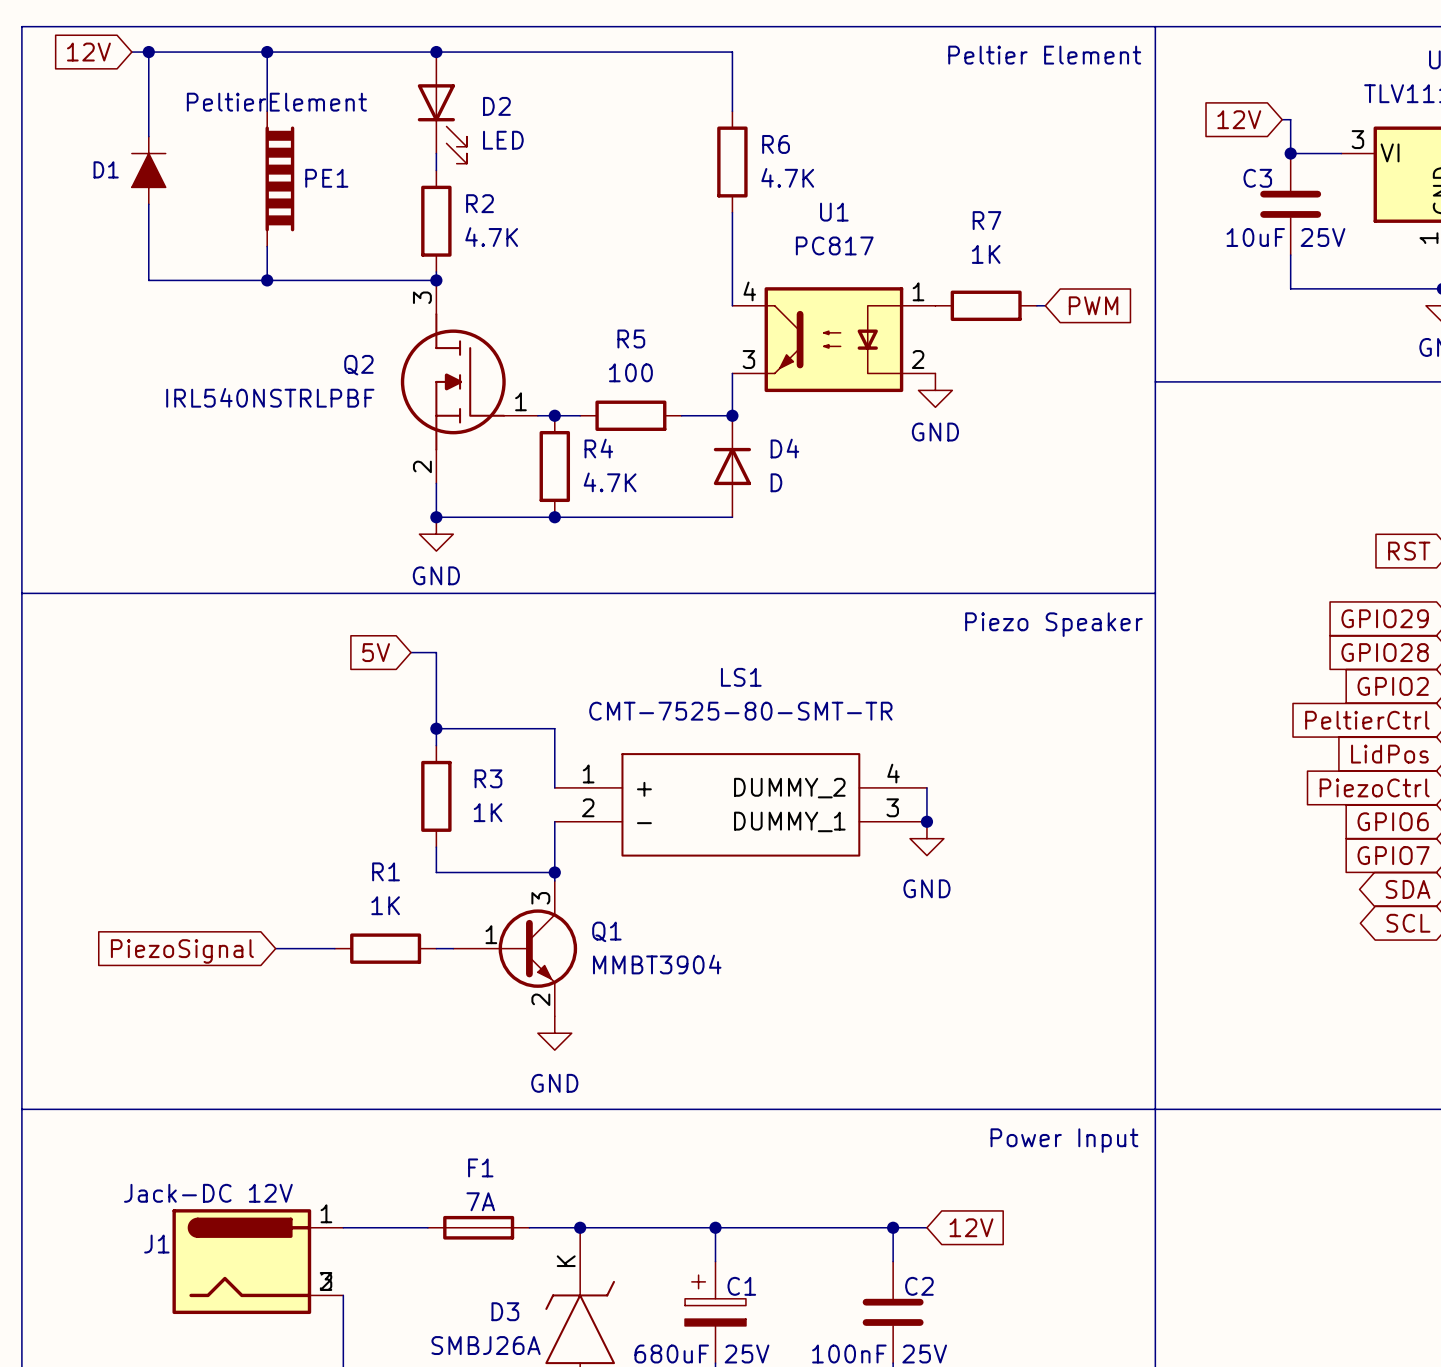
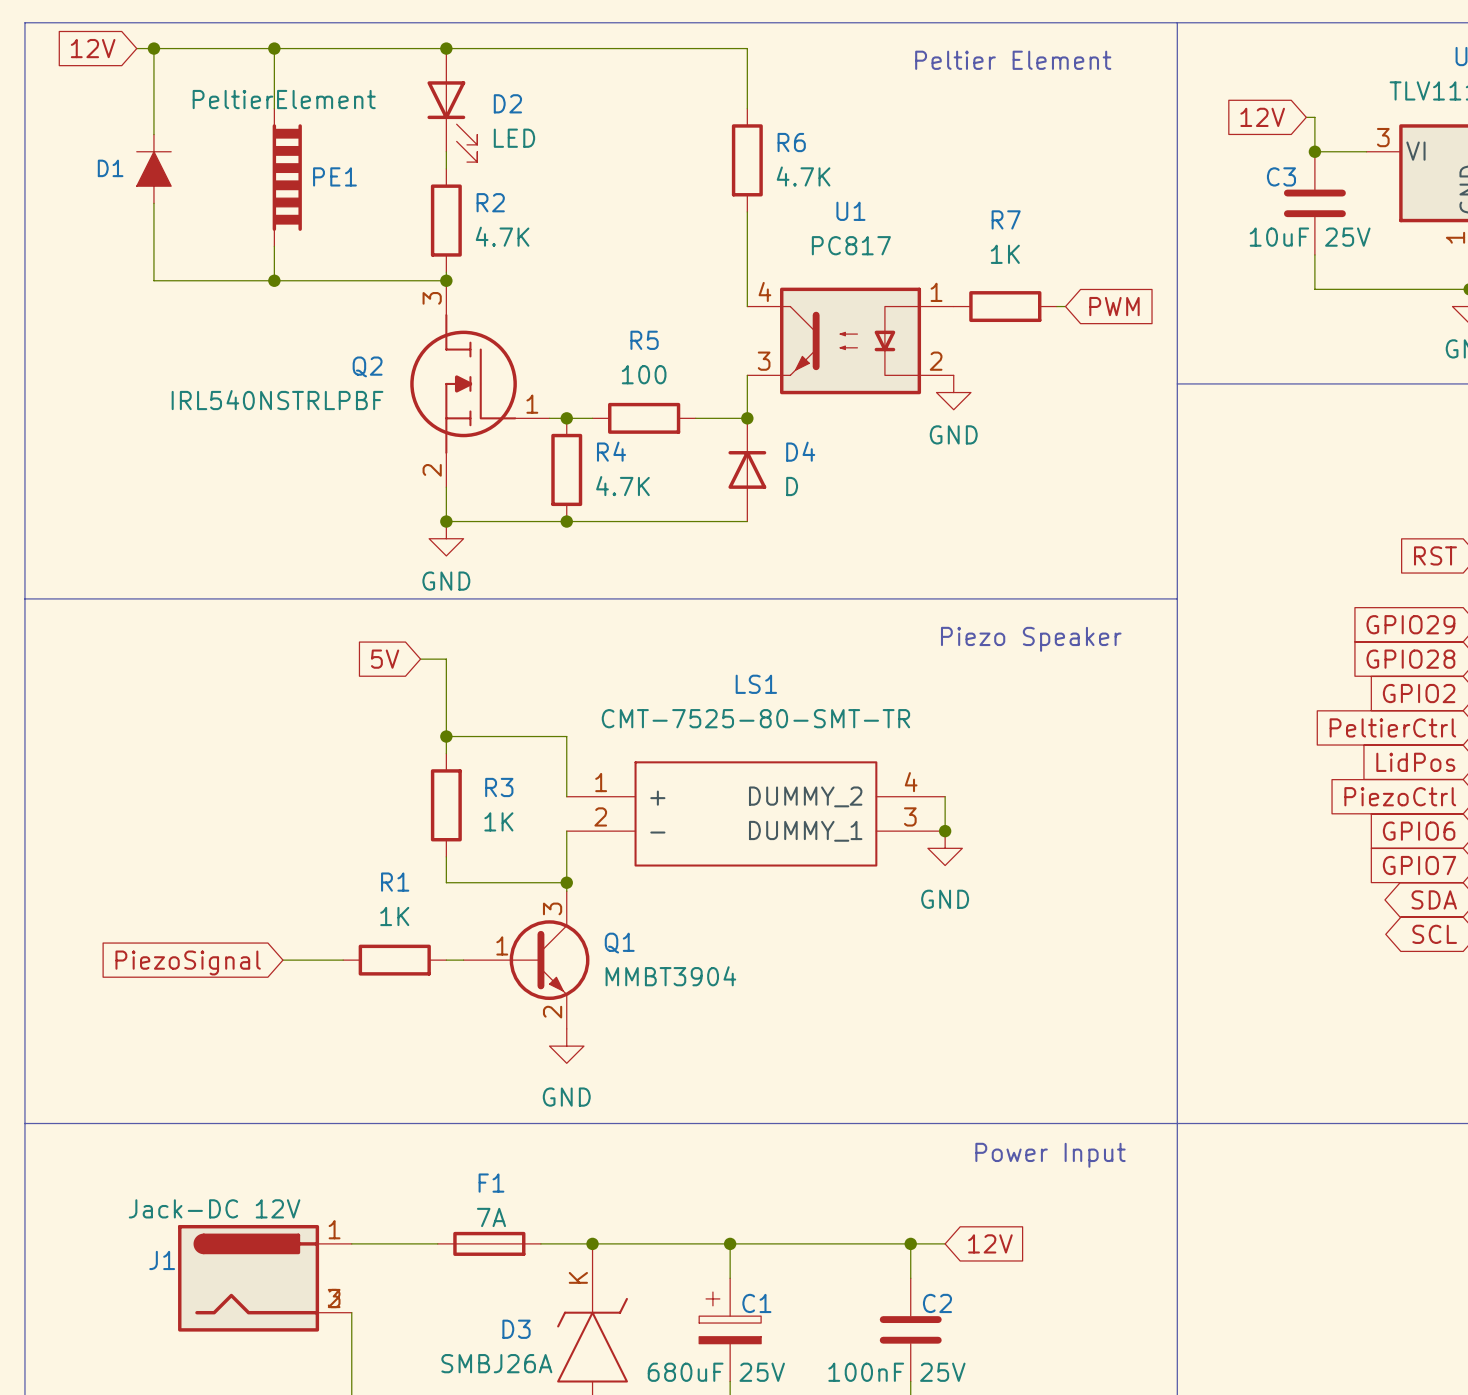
text position: Peltier Element (1044, 55) -> Peltier Element (1013, 60)
text position: Piezo Speaker (1053, 624) -> Piezo Speaker (1031, 639)
text position: Power Input (1064, 1140) -> Power Input (1050, 1155)

